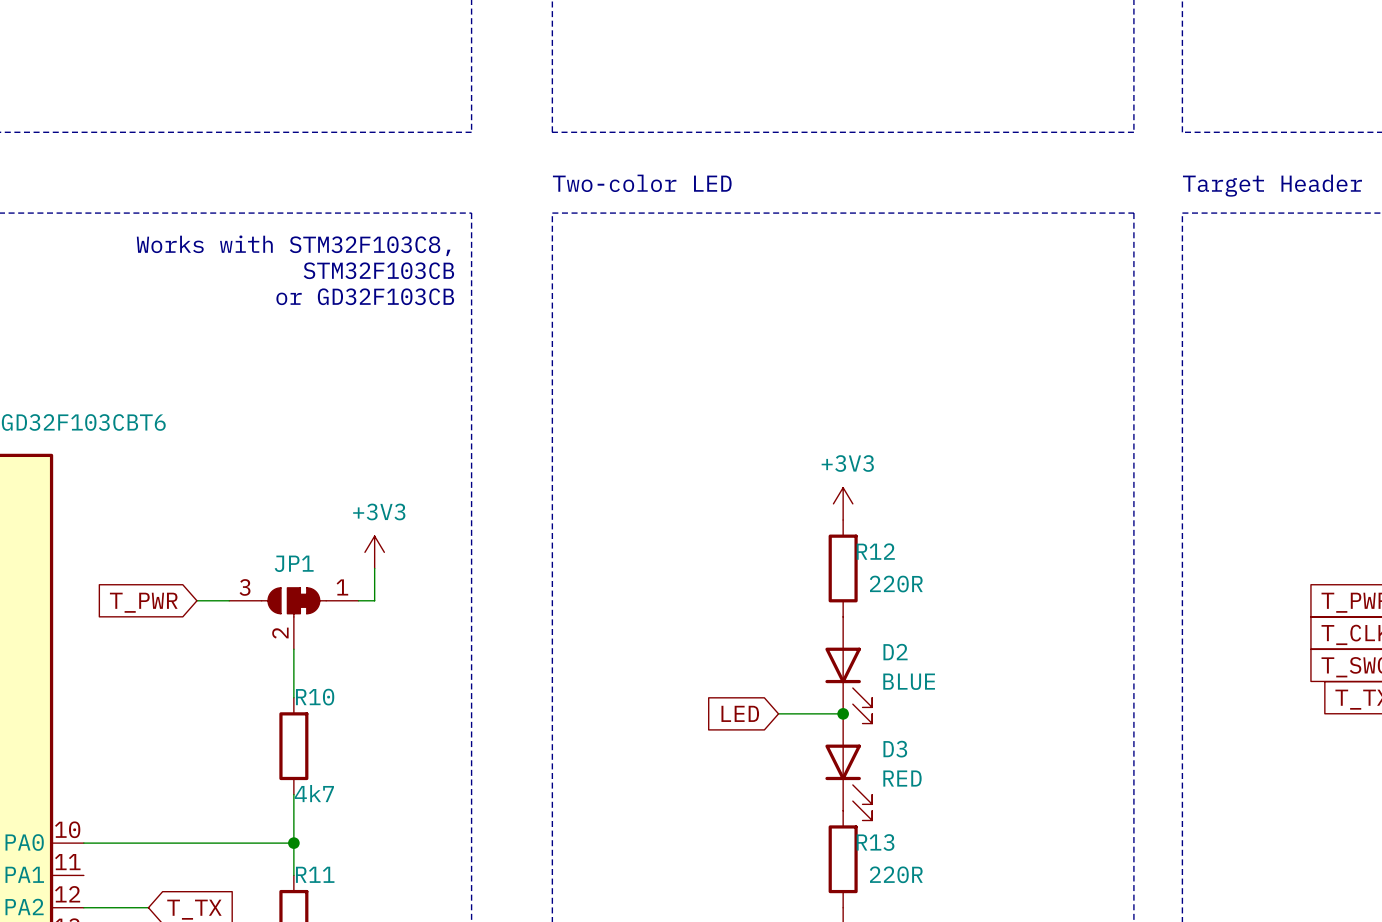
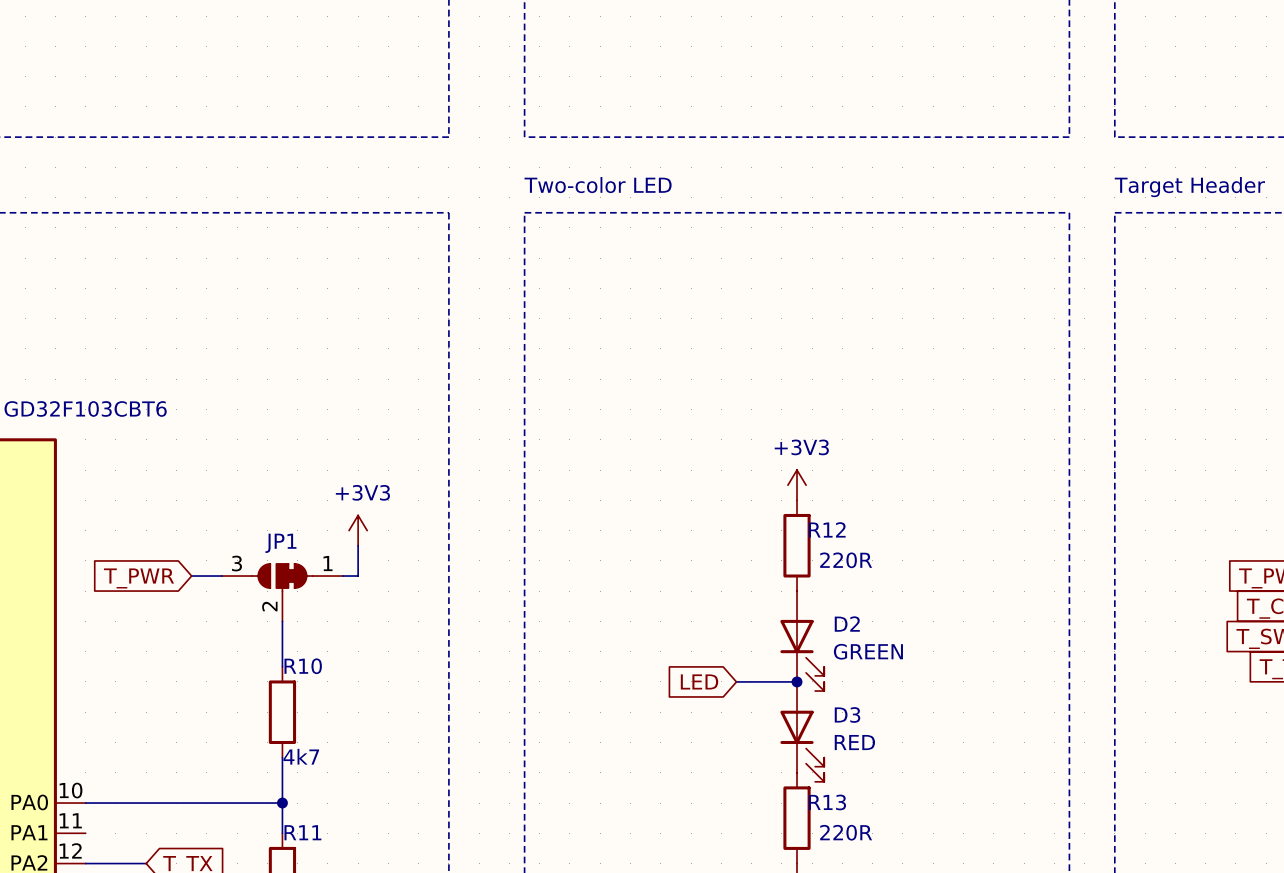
text: Works with STM32F103C8, (293, 245) -> none
text: STM32F103CB (378, 270) -> none
text: or GD32F103CB (365, 296) -> none
D2 value: BLUE (909, 681) -> GREEN (868, 651)

